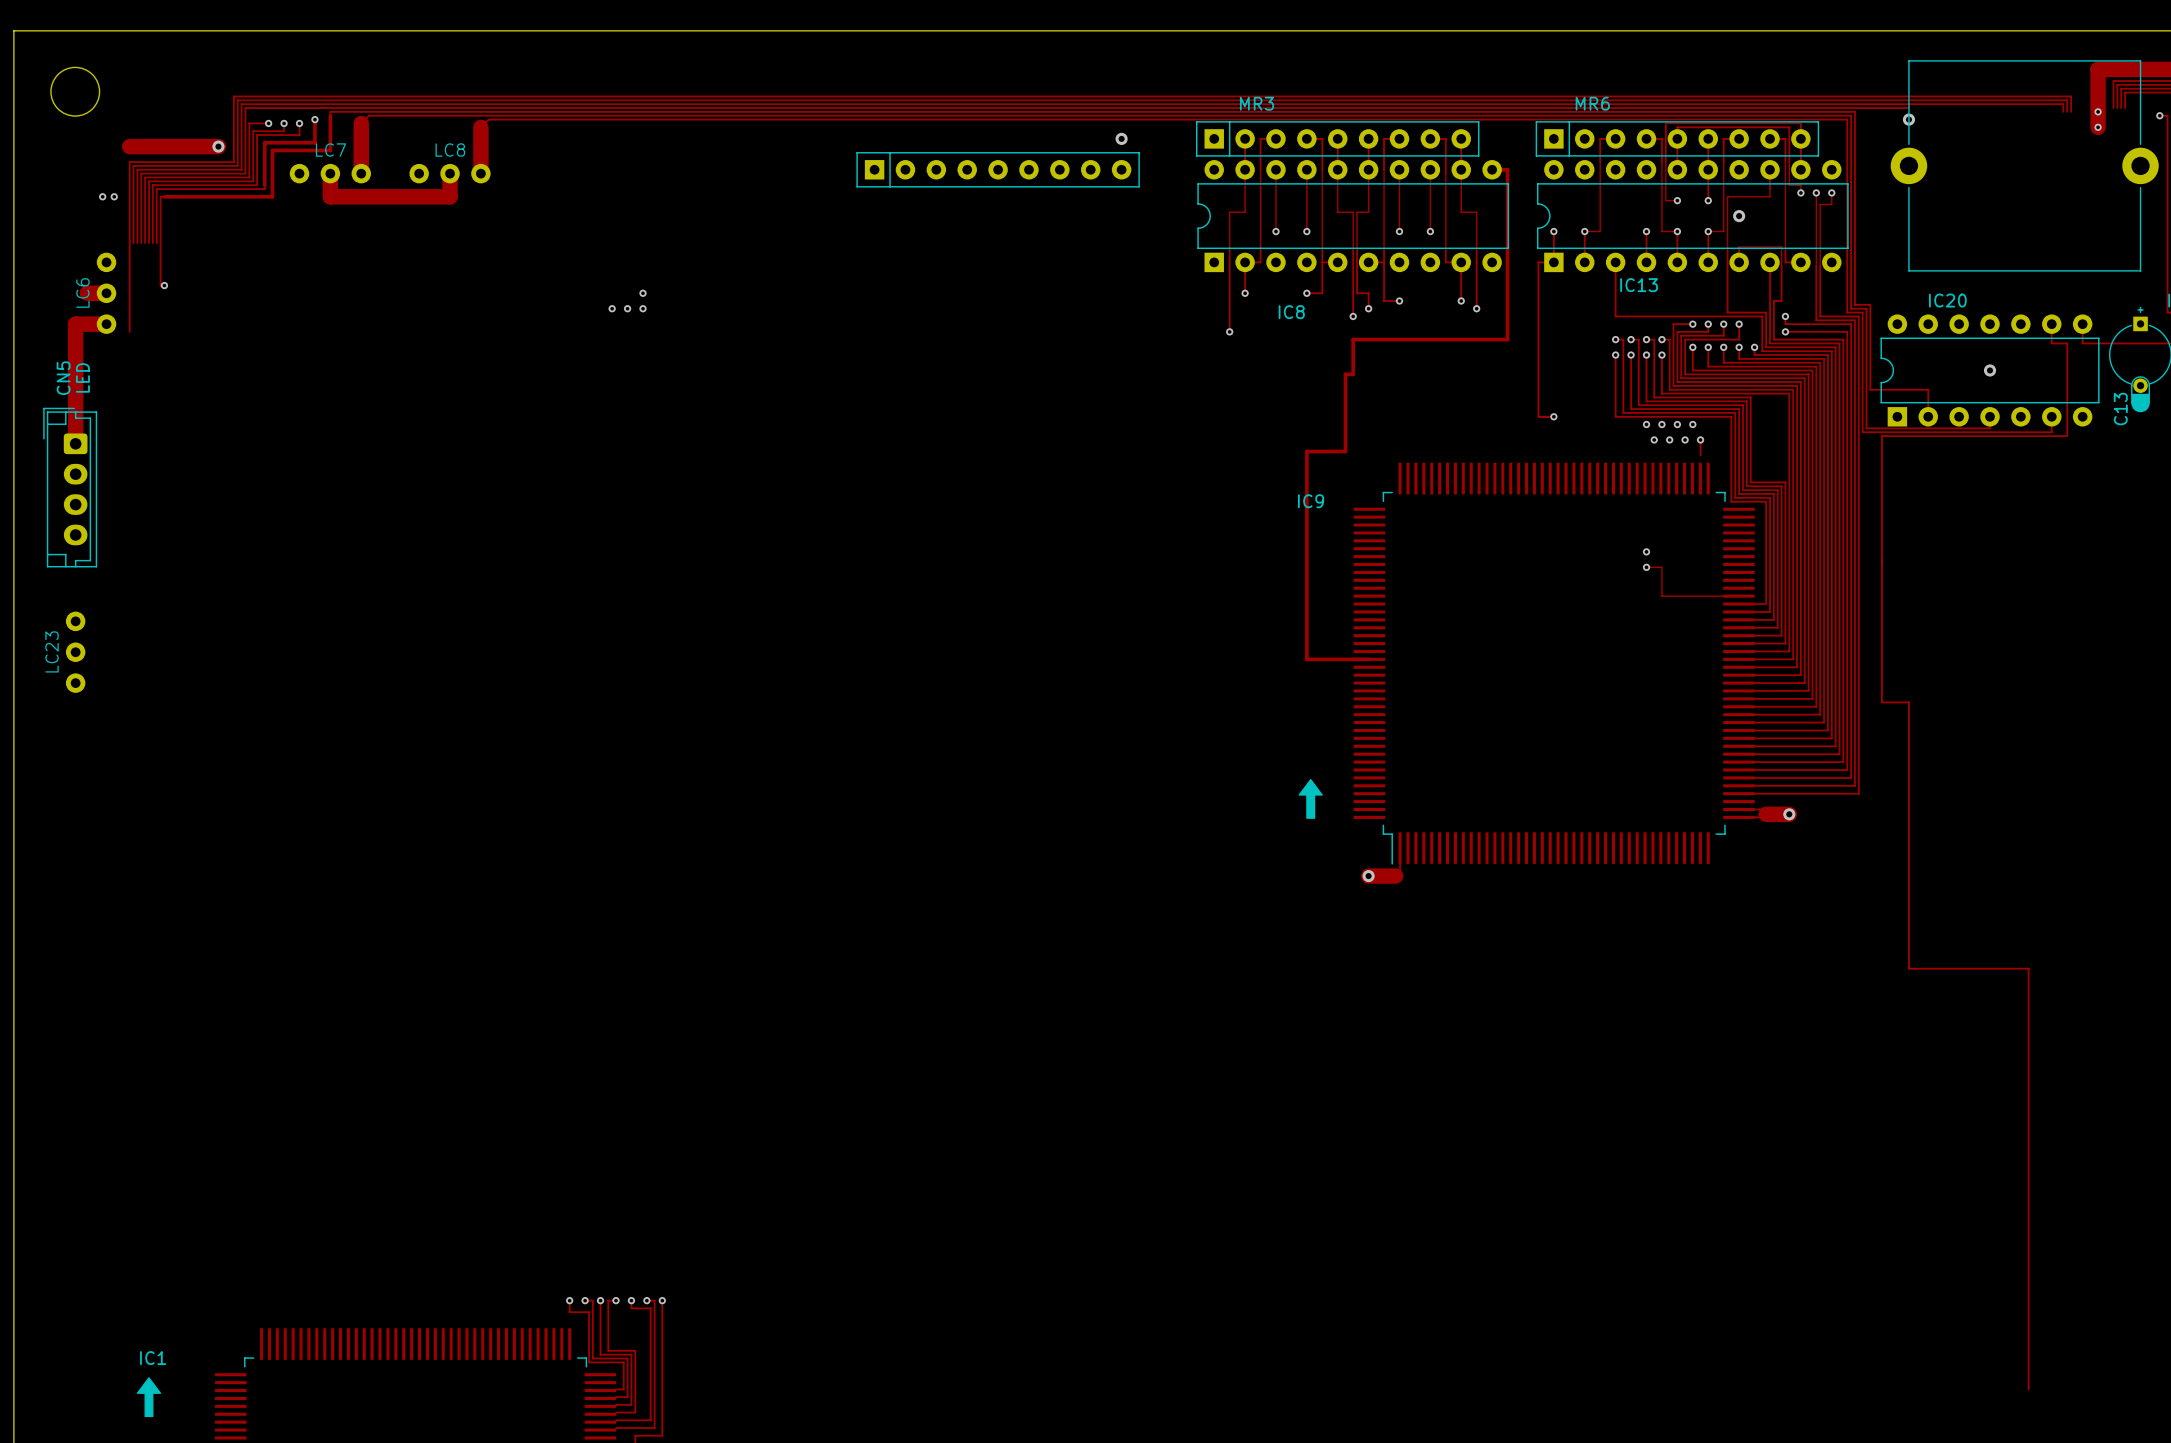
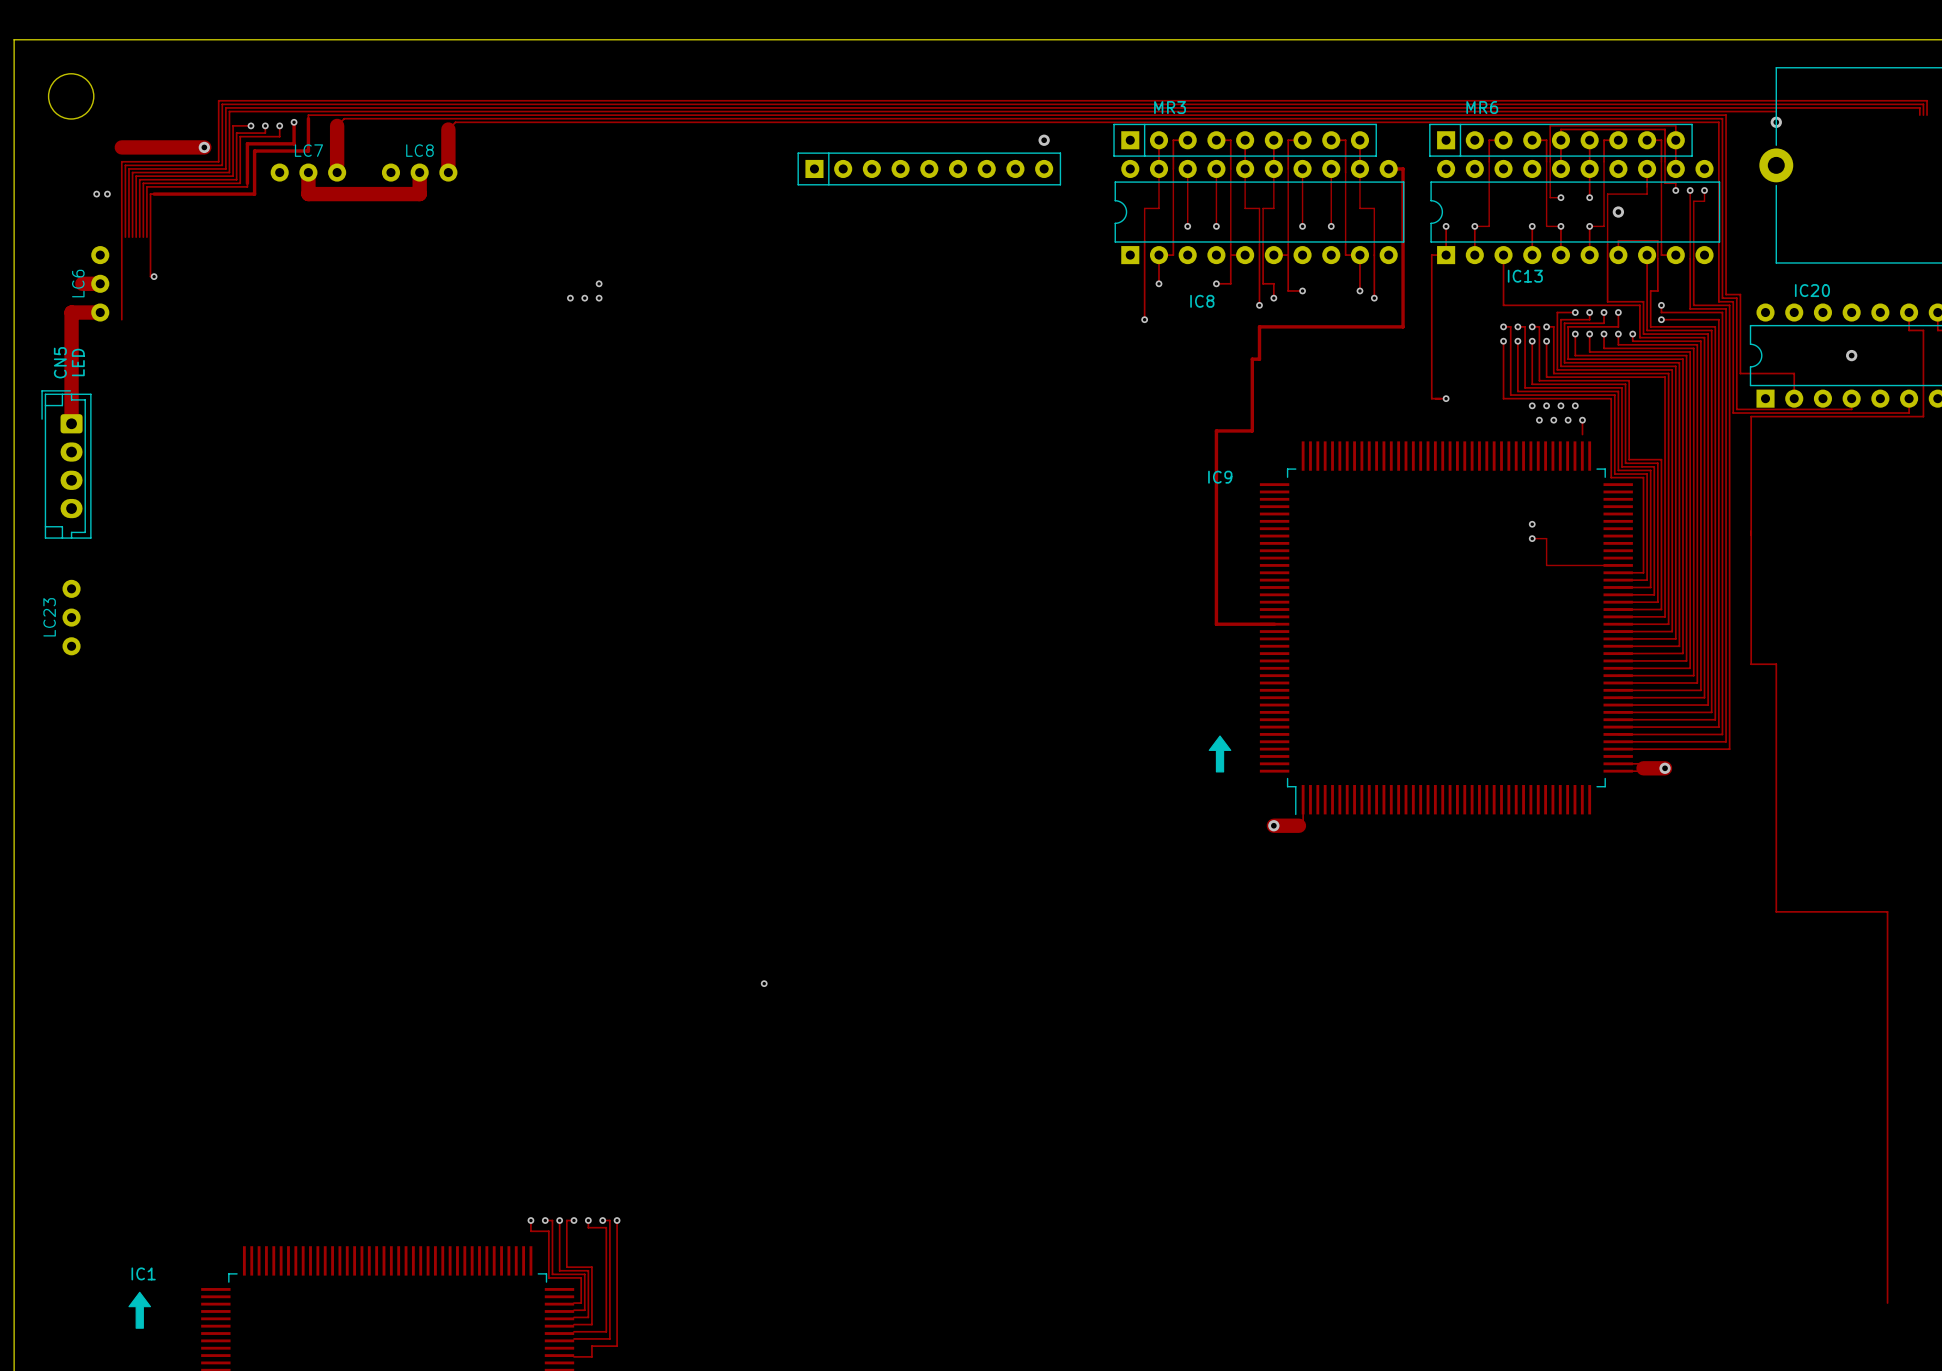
via: none -> (764, 983)

